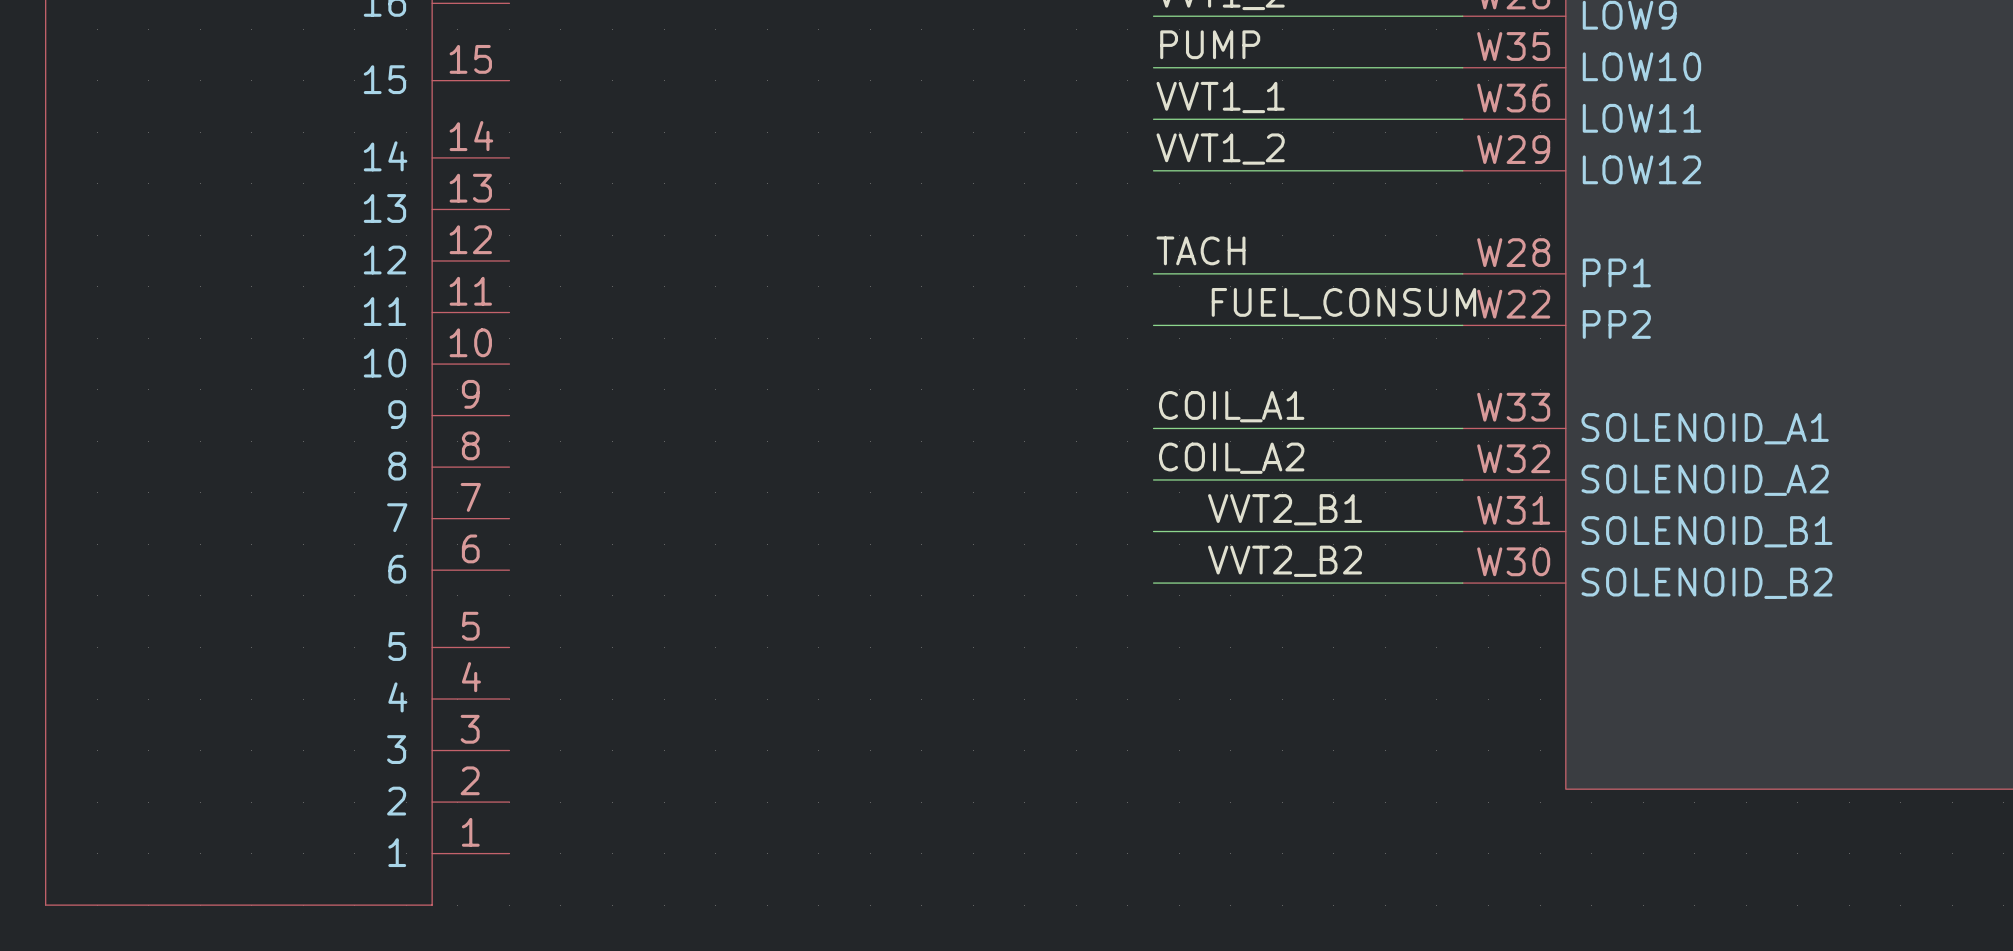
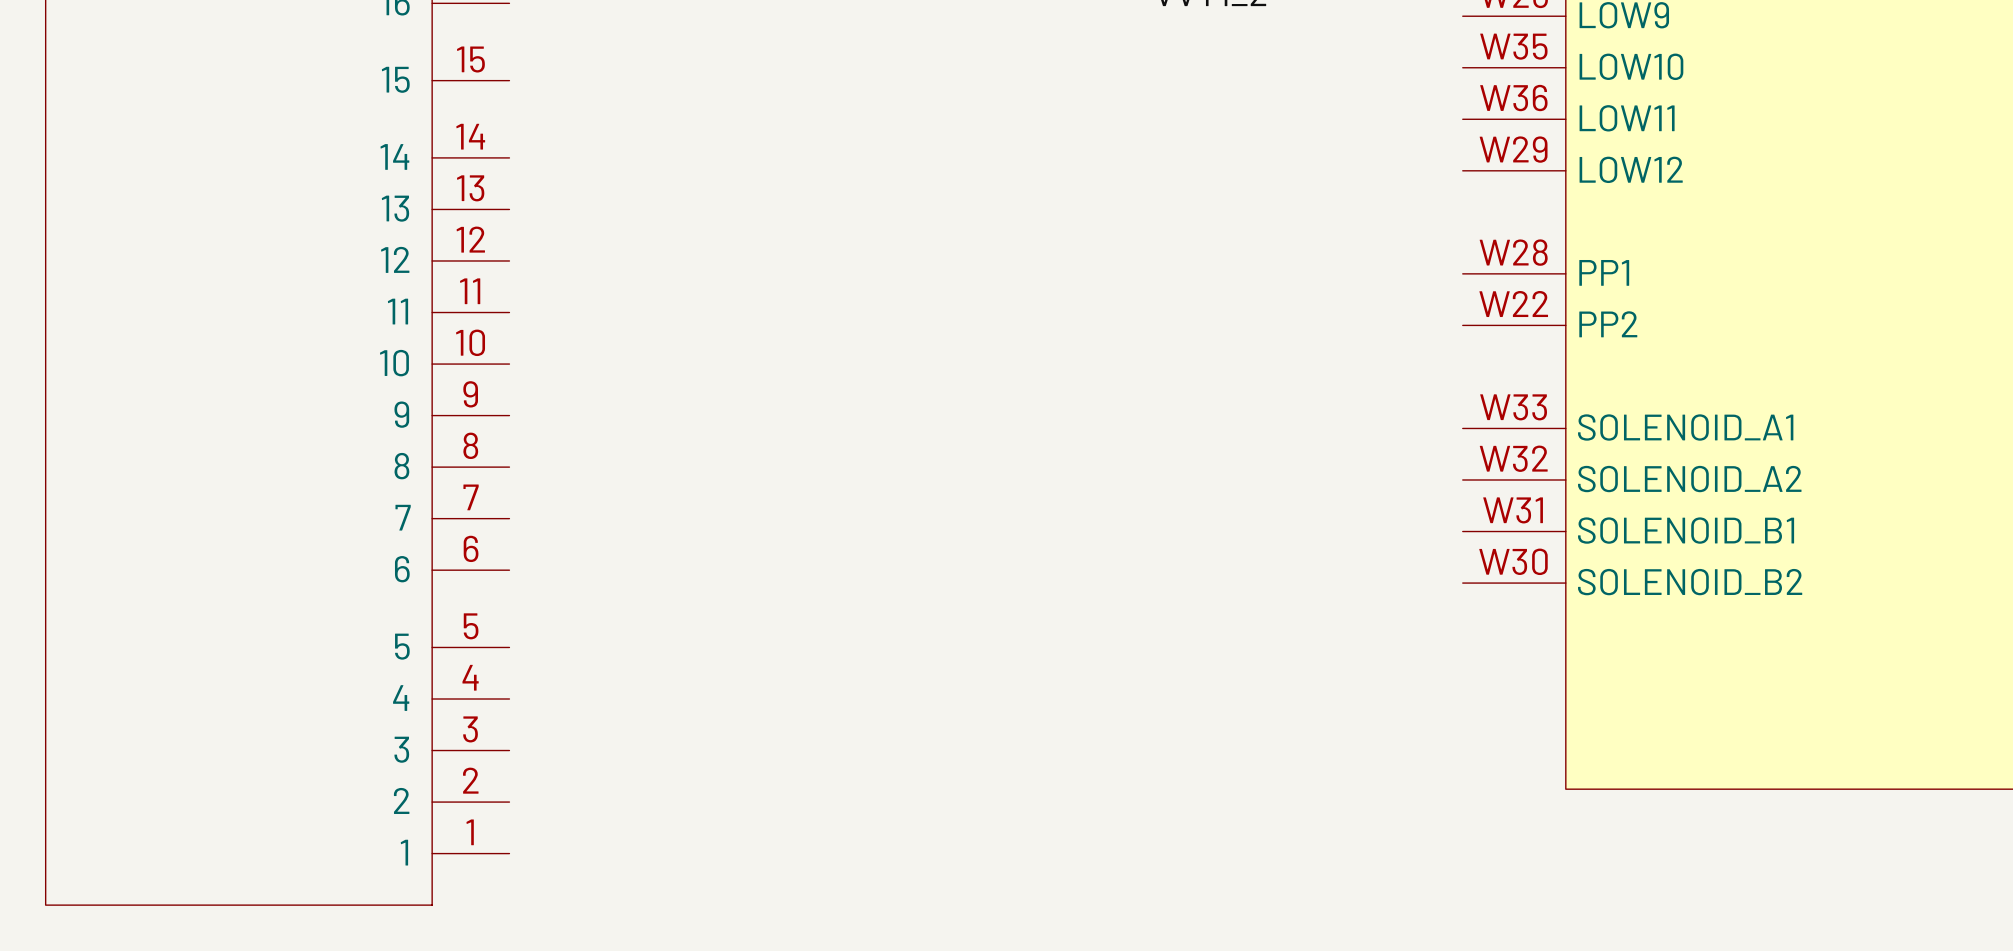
wire: (1153, 16) (1462, 16) -> none
label: PUMP (1210, 44) -> none
wire: (1153, 67) (1462, 67) -> none
label: VVT1_1 (1220, 97) -> none
wire: (1153, 119) (1462, 119) -> none
label: VVT1_2 (1220, 149) -> none
wire: (1153, 170) (1462, 170) -> none
label: TACH (1201, 250) -> none
wire: (1153, 273) (1462, 273) -> none
label: FUEL_CONSUM (1343, 303) -> none
wire: (1153, 325) (1462, 325) -> none
label: COIL_A1 (1231, 406) -> none
wire: (1153, 428) (1462, 428) -> none
label: COIL_A2 (1231, 458) -> none
wire: (1153, 479) (1462, 479) -> none
label: VVT2_B1 (1285, 509) -> none
wire: (1153, 531) (1462, 531) -> none
label: VVT2_B2 (1285, 561) -> none
wire: (1153, 583) (1462, 583) -> none

